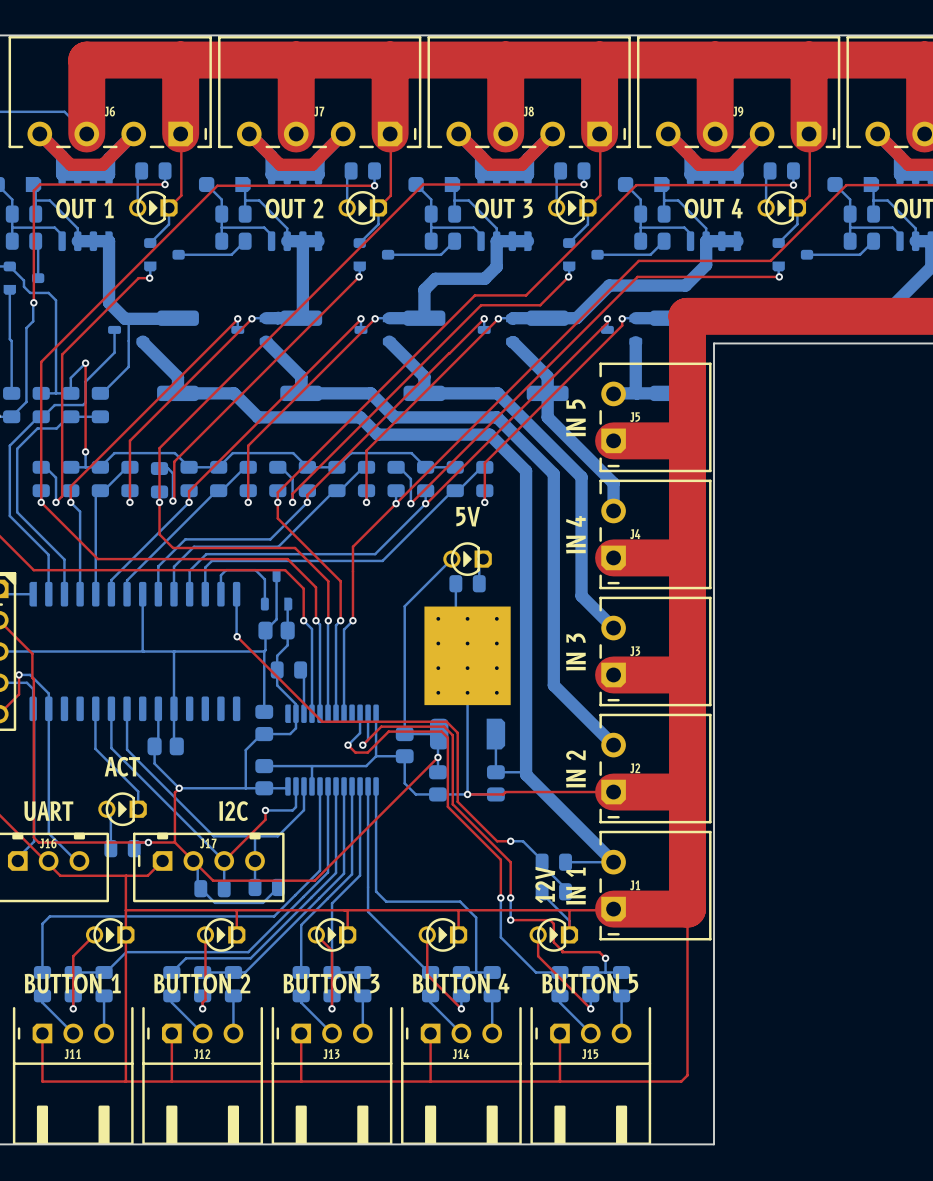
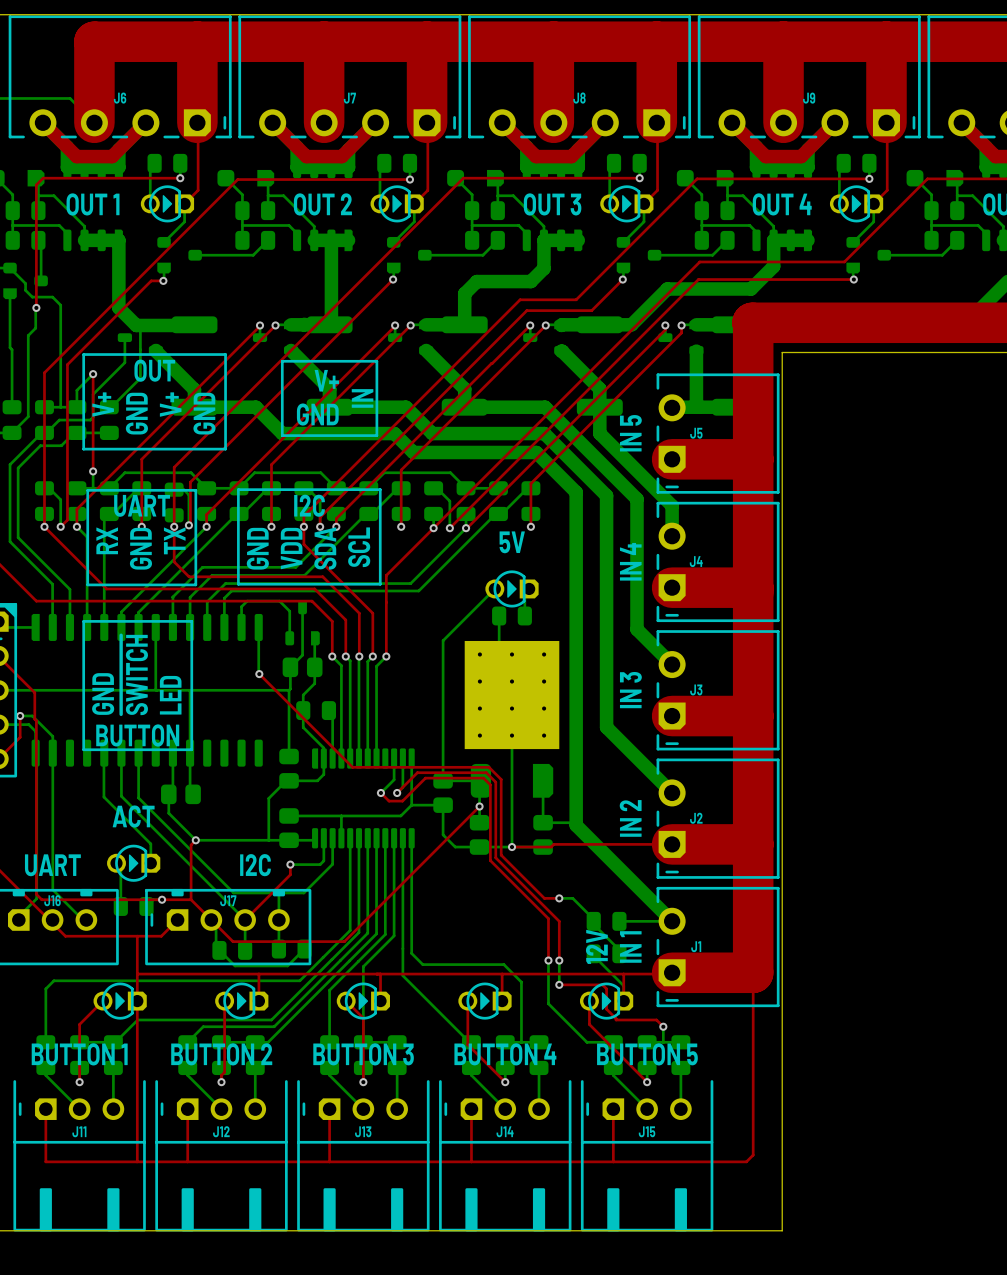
line: none -> (83, 354) (225, 354) (225, 449) (83, 449) (83, 354)
line: none -> (282, 361) (376, 361) (376, 435) (282, 435) (282, 361)
text: none -> OUT (154, 370)
text: none -> V+ (326, 380)
text: none -> IN (362, 398)
text: none -> V+ (103, 404)
text: none -> V+ (170, 404)
text: none -> GND (136, 413)
text: none -> GND (204, 413)
text: none -> GND (317, 414)
line: none -> (238, 489) (380, 489) (380, 584) (238, 584) (238, 489)
line: none -> (87, 490) (195, 490) (195, 584) (87, 584) (87, 490)
text: none -> UART (142, 505)
text: none -> I2C (309, 505)
text: none -> RX (107, 540)
text: none -> TX (174, 540)
text: none -> SCL (359, 547)
text: none -> SDA (325, 548)
text: none -> VDD (291, 548)
text: none -> GND (140, 548)
text: none -> GND (257, 548)
line: none -> (83, 621) (83, 749) (191, 749) (191, 621) (83, 621)
text: none -> ~{SWITCH} (134, 675)
text: none -> GND (103, 694)
text: none -> LED (170, 695)
text: none -> BUTTON (137, 735)

